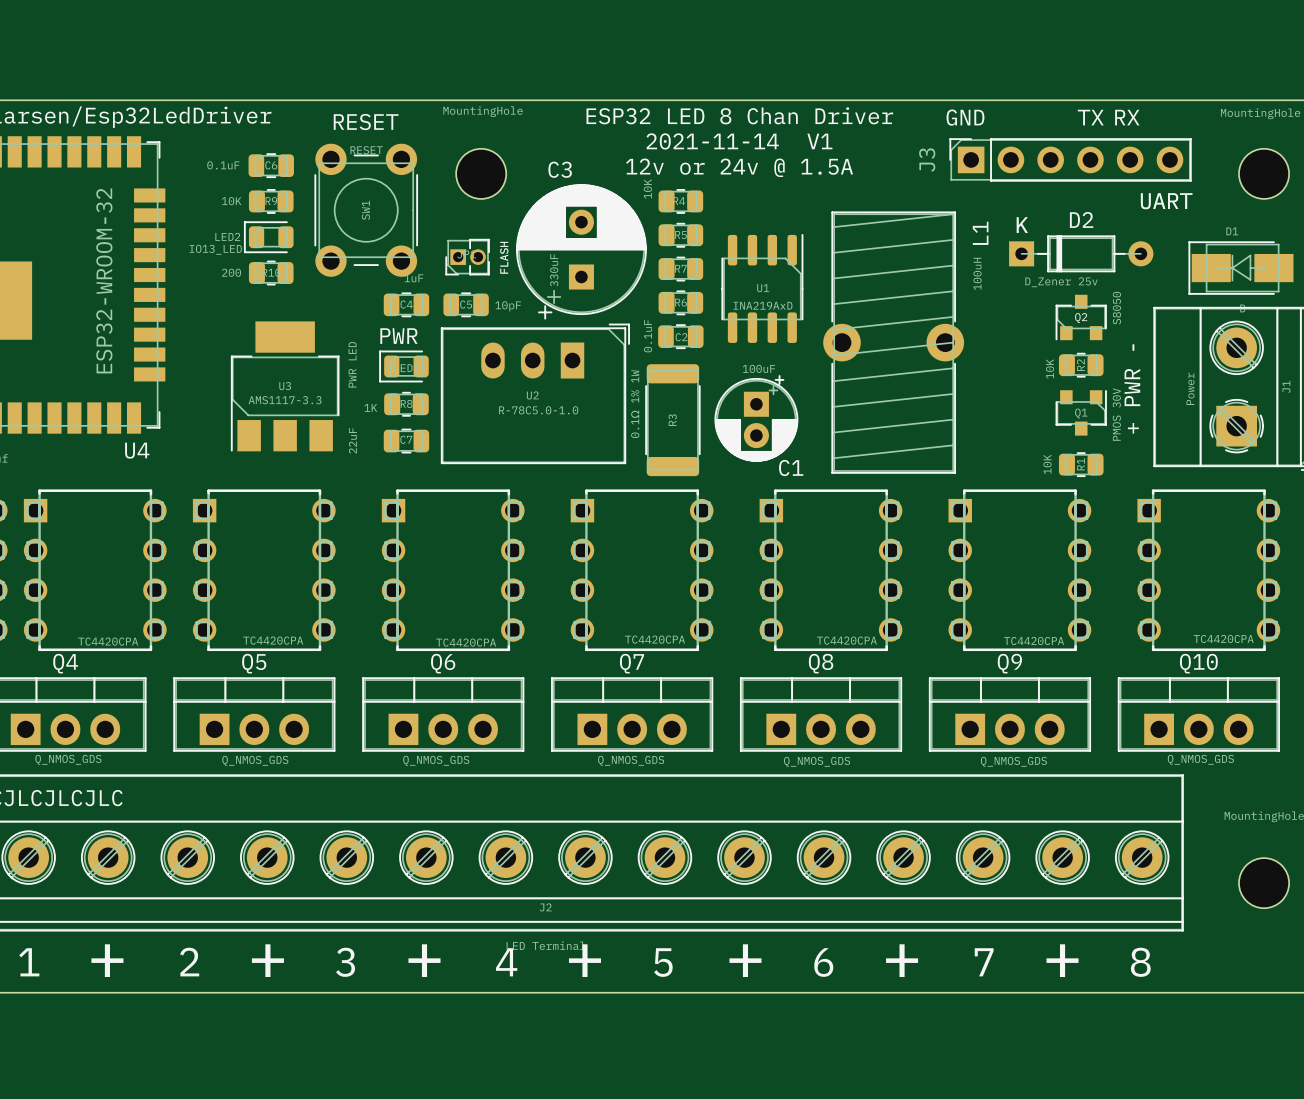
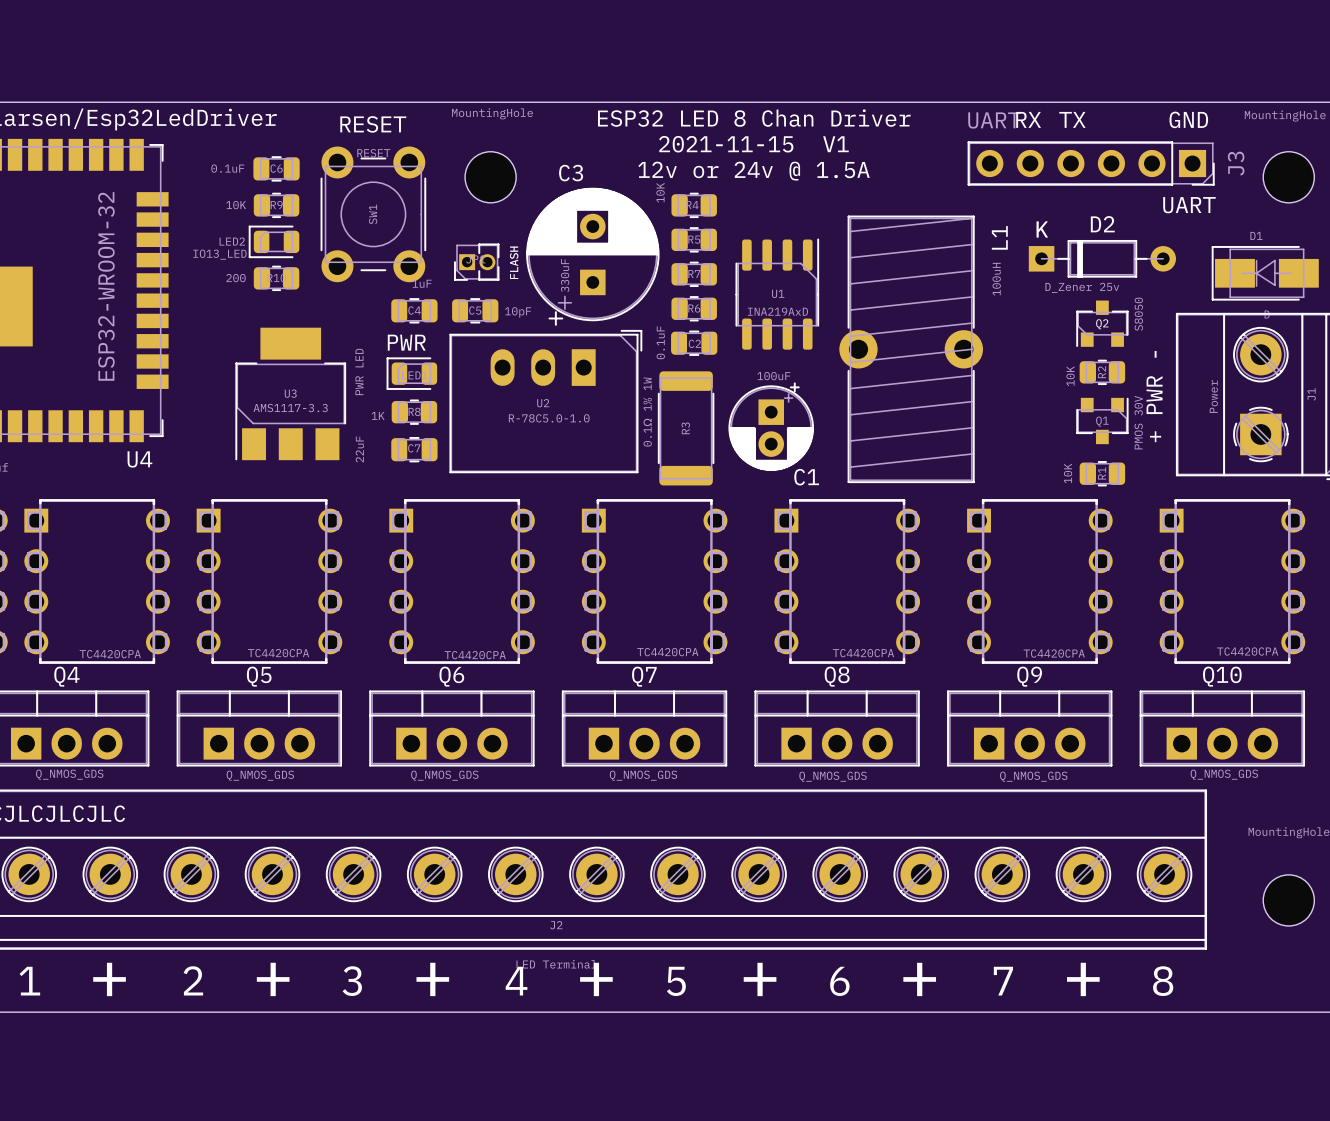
text position: GND (965, 117) -> GND (1188, 119)
text position: TX (1090, 117) -> TX (1072, 119)
text position: RX (1127, 117) -> RX (1028, 119)
text: 2021-11-14 V1 (739, 141) -> 2021-11-15 V1 (753, 144)
J3 rotation: 0° (1070, 159) -> 180° (1091, 163)

